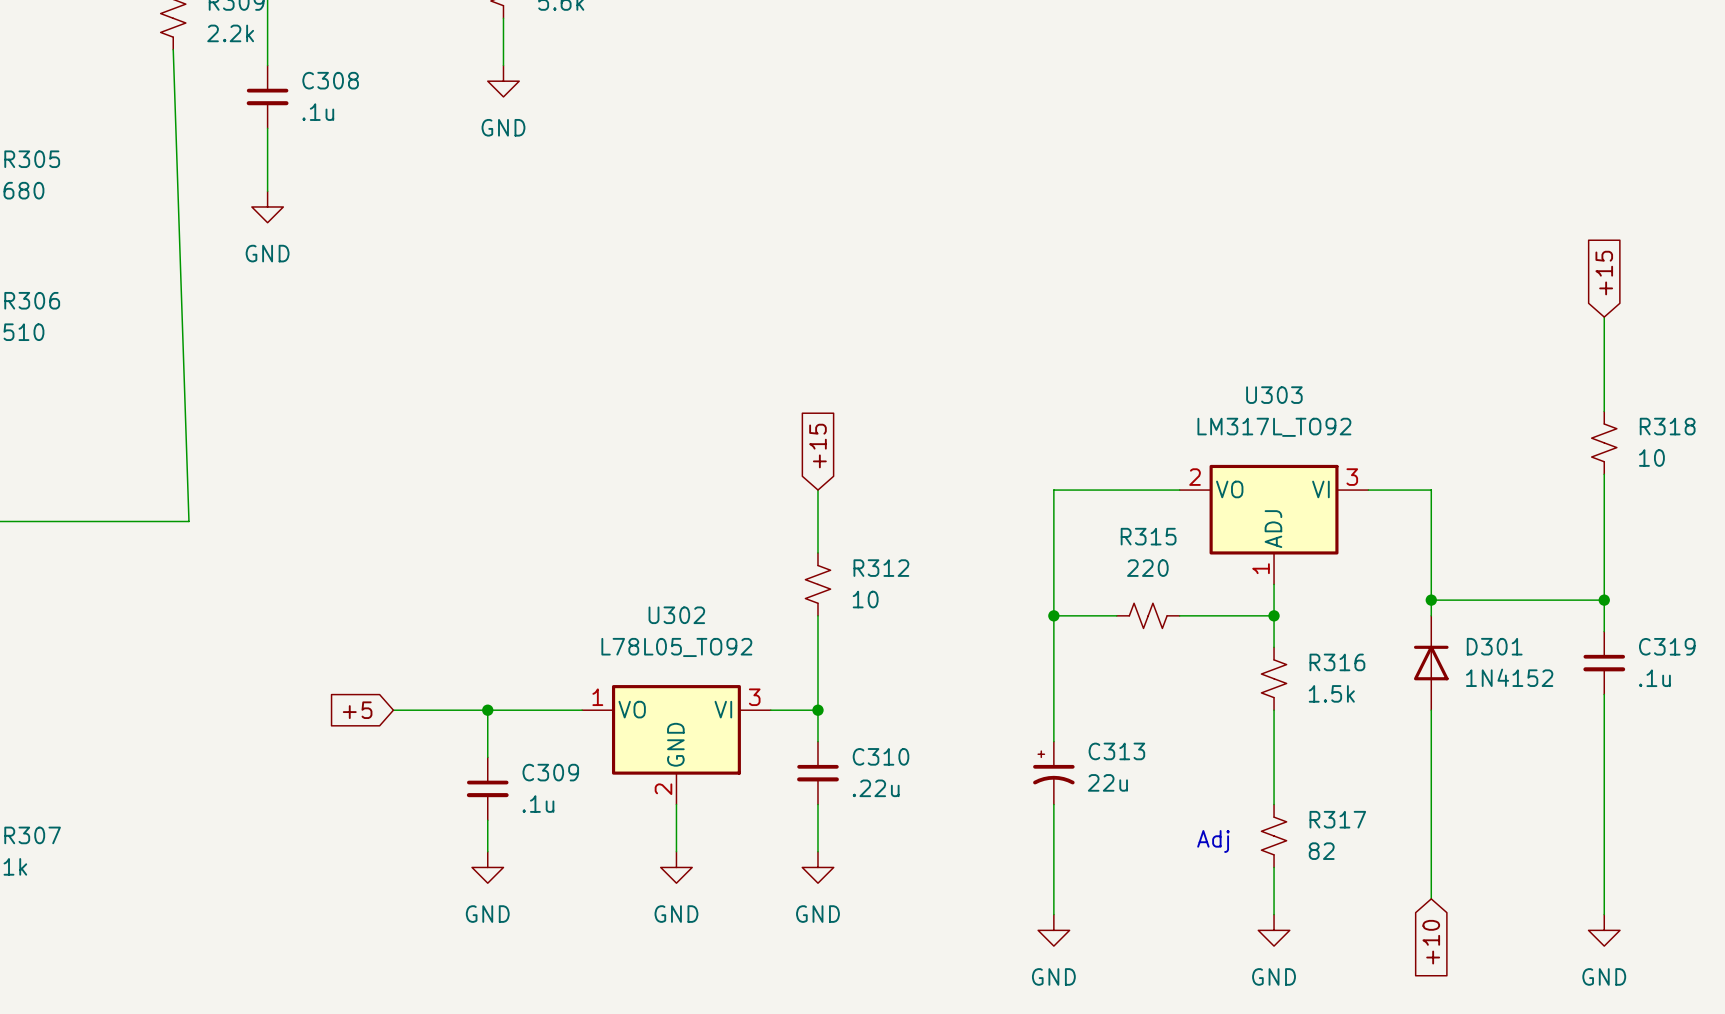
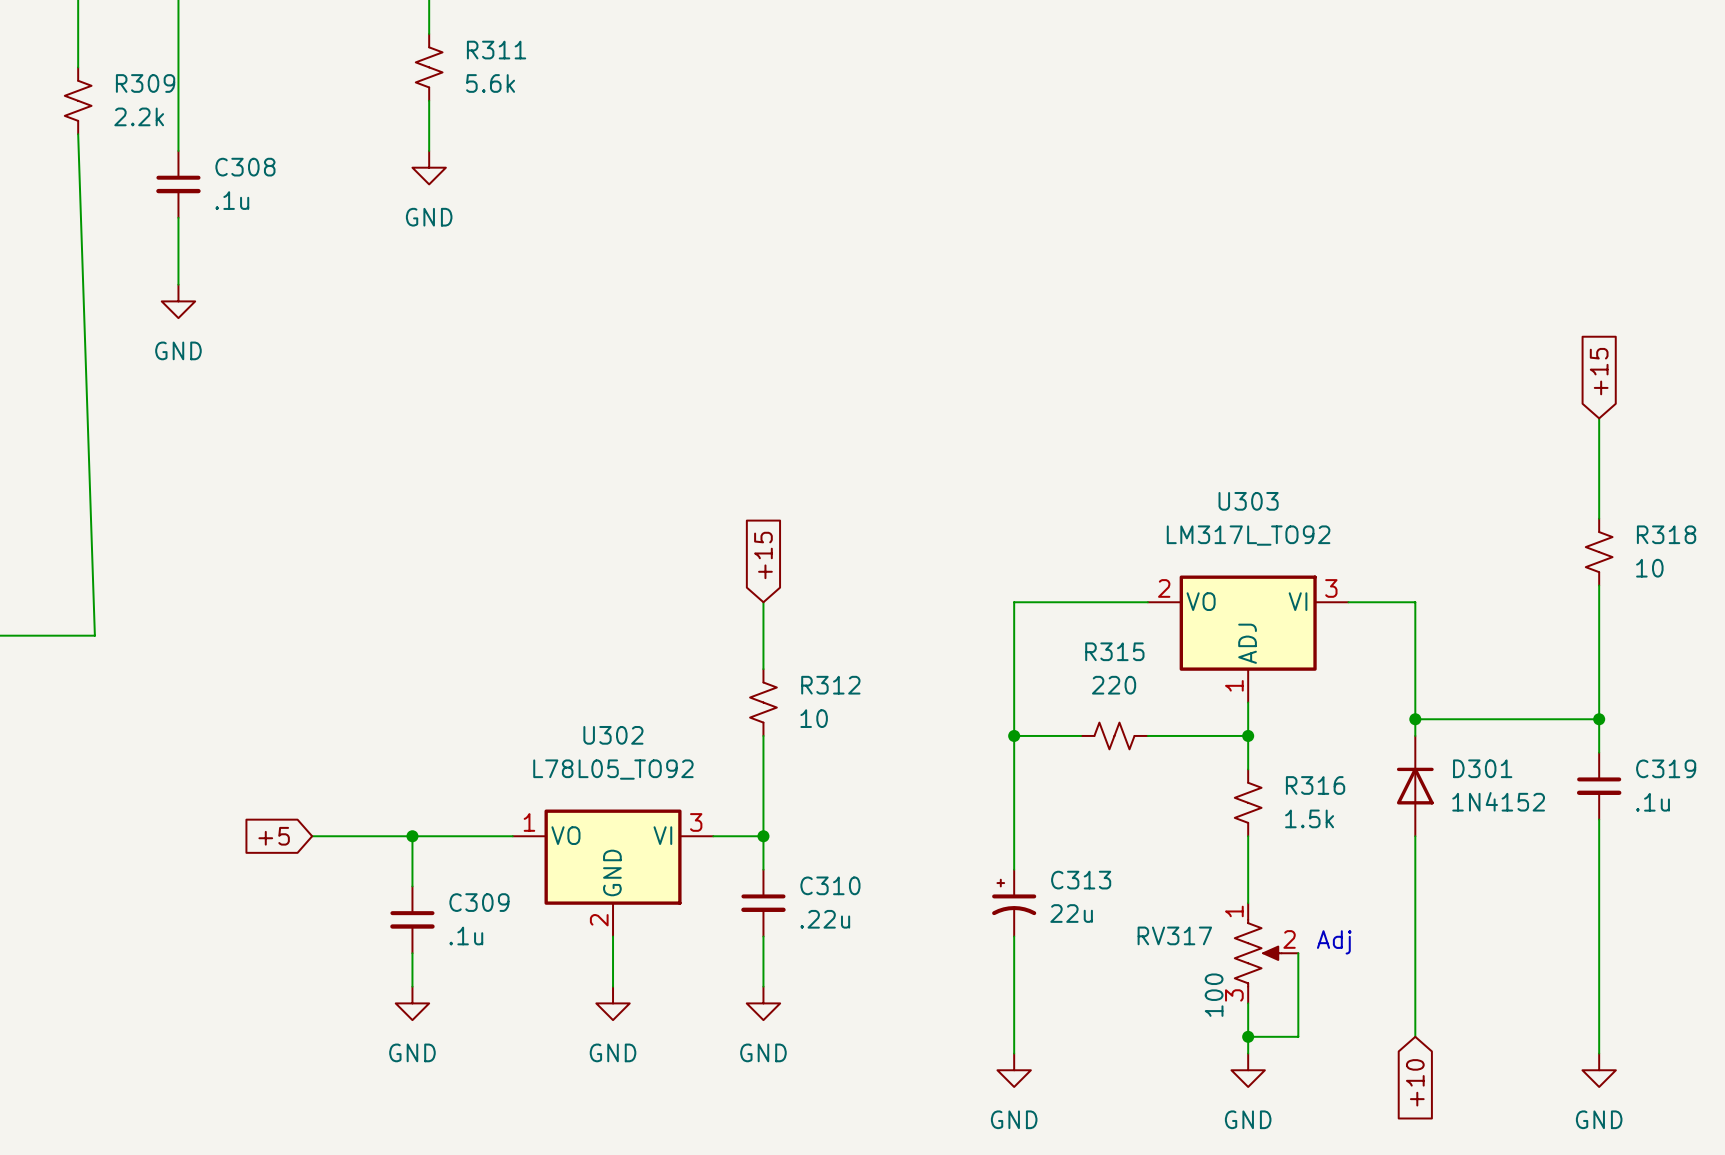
RV317: none -> 100 (1266, 953)
wire: none -> (1298, 953) (1298, 1036) (1248, 1036)
R317: 82 (1274, 836) -> none
text position: Adj (1213, 841) -> Adj (1334, 942)
junction: none -> (1248, 1036)

